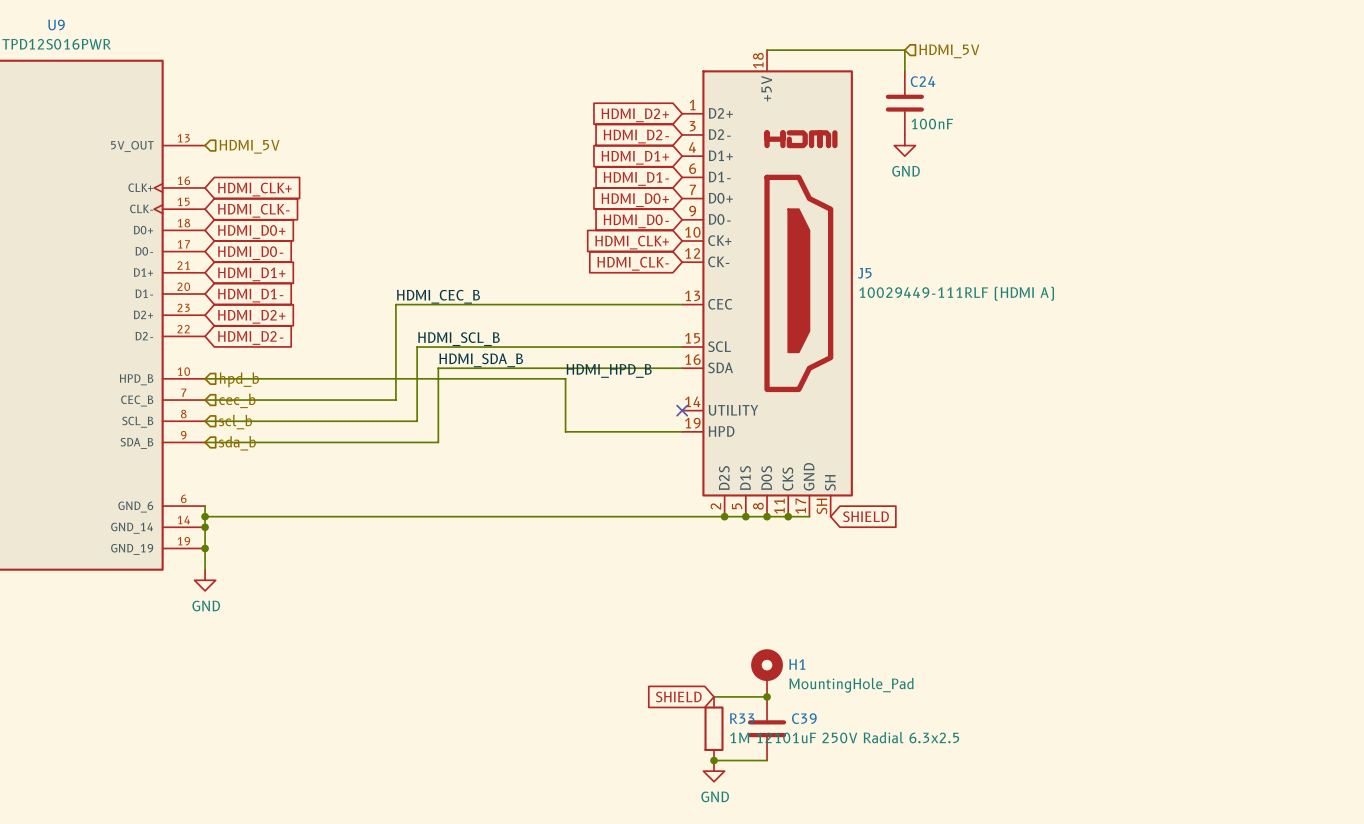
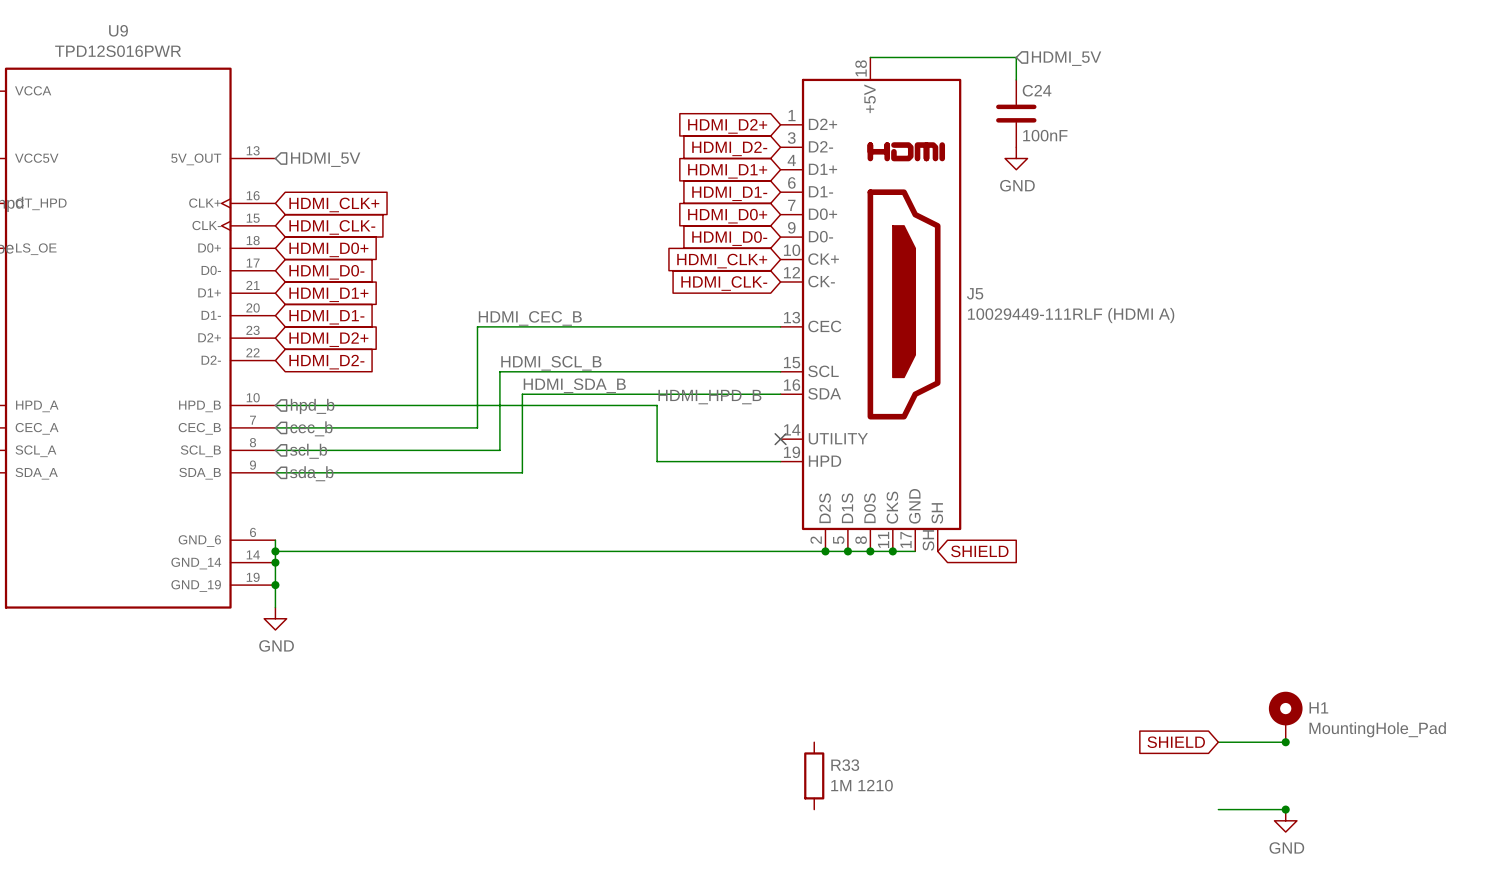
H1 position: (767, 673) -> (1285, 716)
global label: SHIELD (678, 696) -> none
wire: (714, 696) (767, 696) -> none
junction: (767, 696) -> none
global label: none -> SHIELD (1176, 742)
wire: none -> (1218, 742) (1285, 742)
junction: none -> (1285, 742)
C39: 1uF 250V Radial 6.3x2.5 (767, 728) -> none
wire: (714, 760) (767, 760) -> none
junction: (714, 760) -> none
wire: none -> (1218, 809) (1285, 809)
junction: none -> (1285, 809)
power symbol: GND (714, 771) -> none
power symbol: none -> GND (1285, 820)

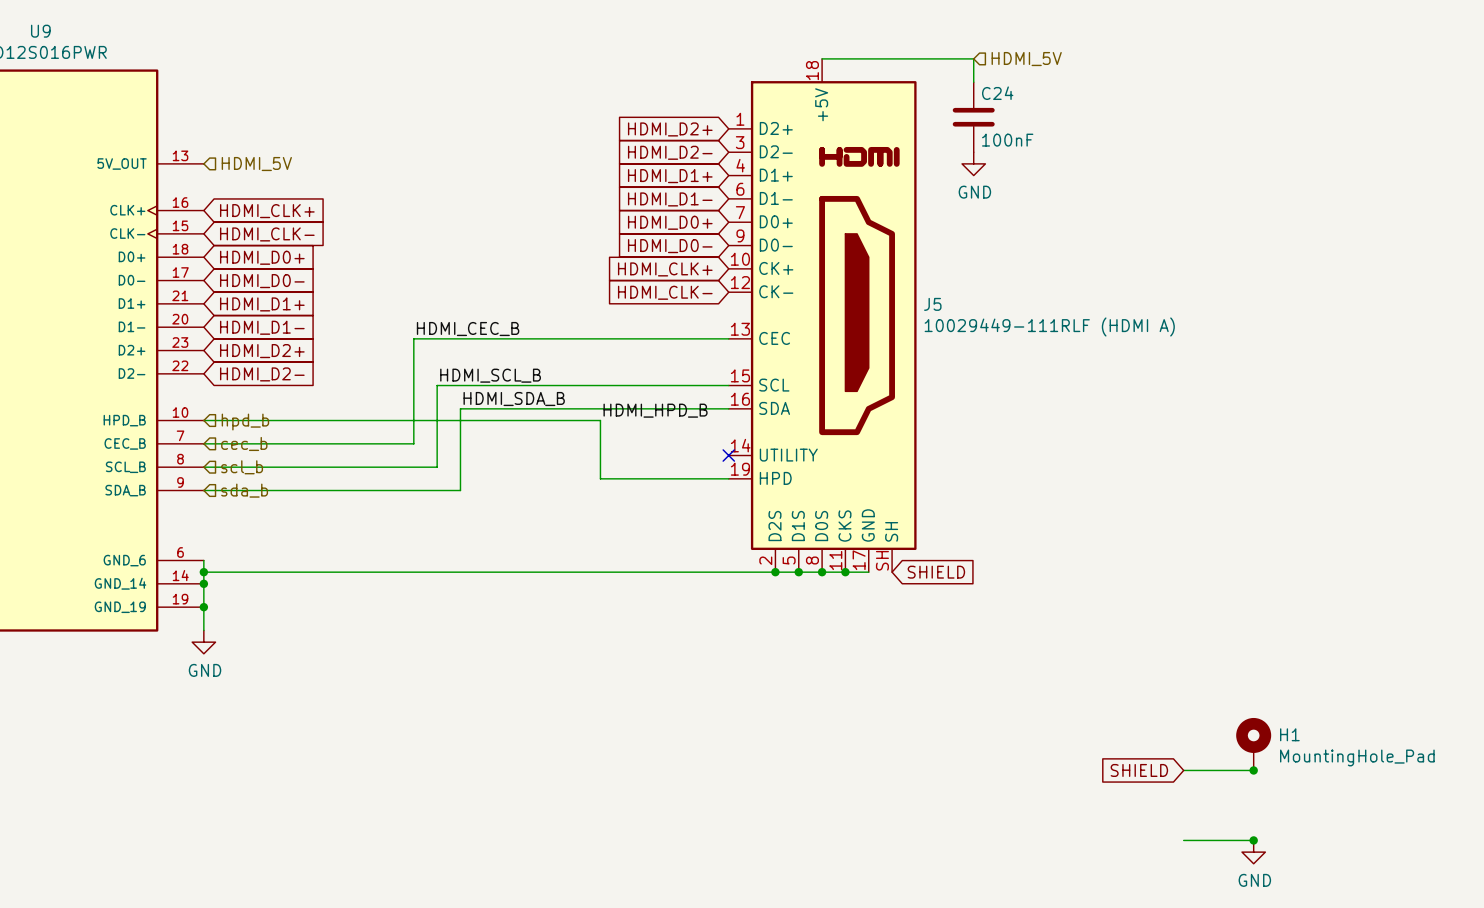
R33: 1M 1210 (814, 775) -> none

